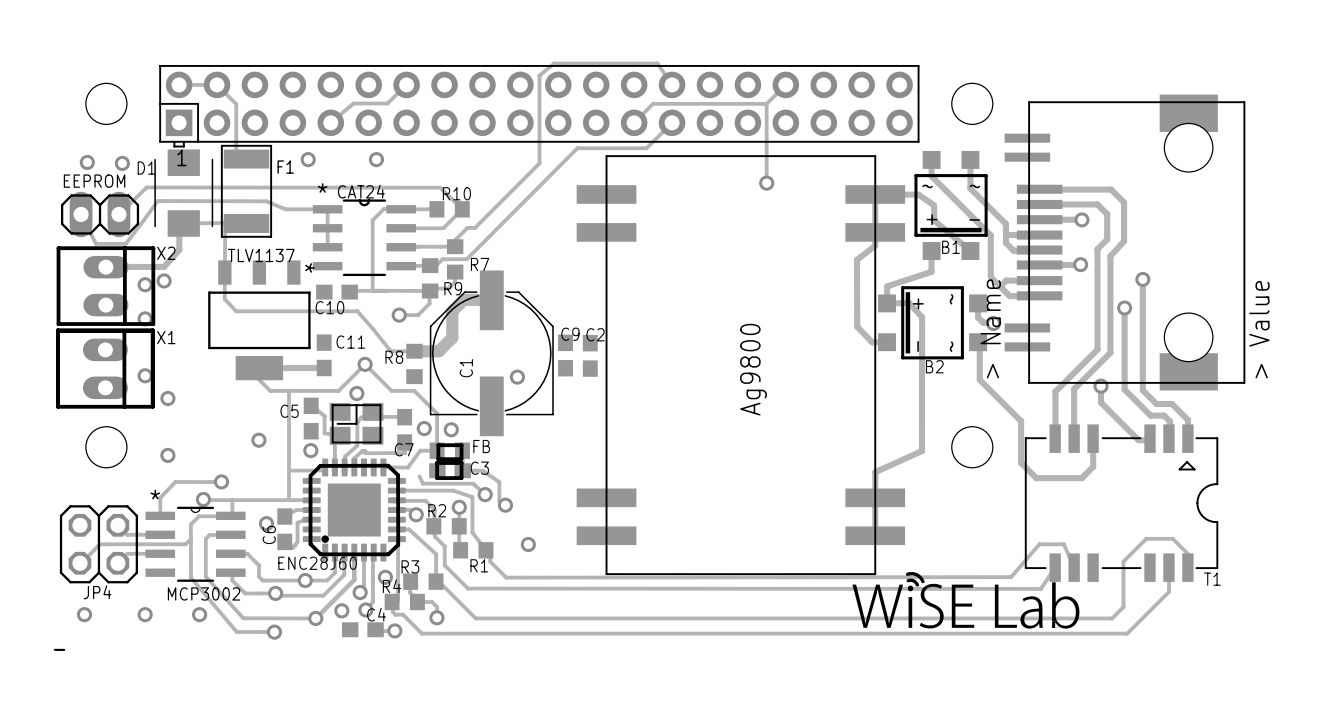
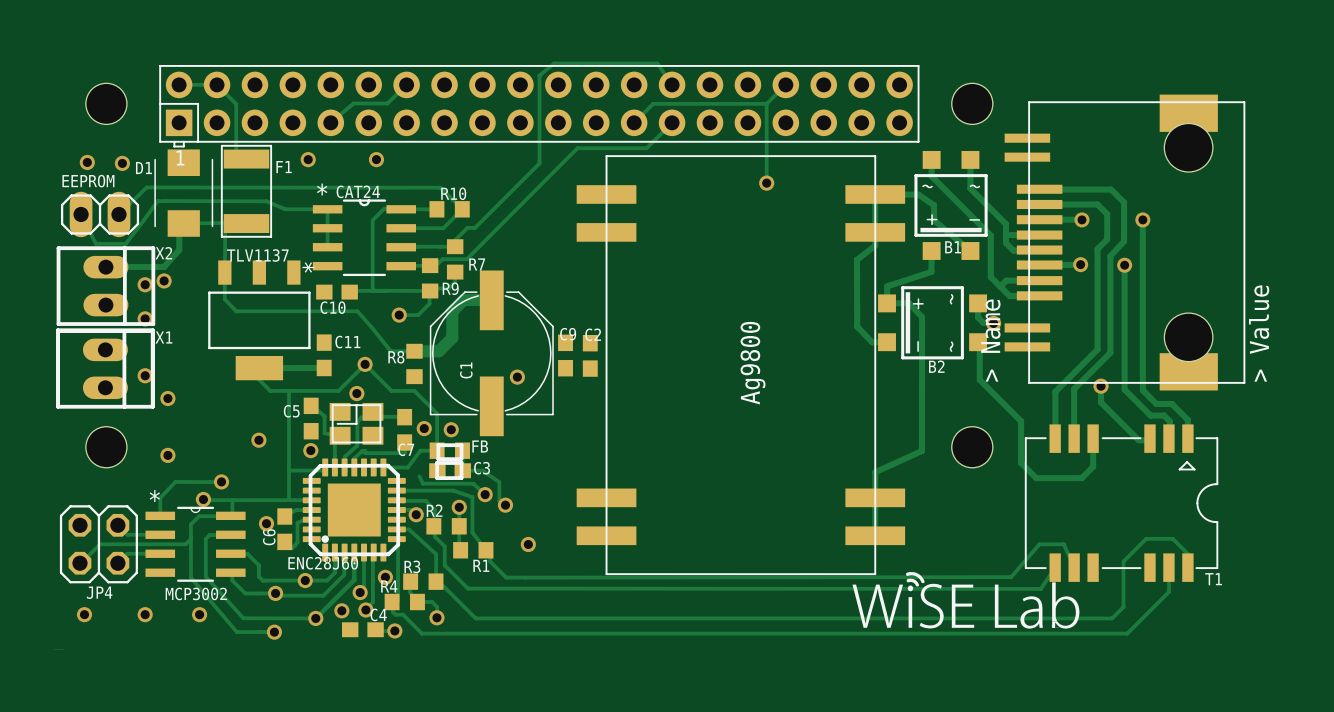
track: none -> (1142, 219) (1142, 279)
via: none -> (1142, 219)
track: none -> (1124, 265) (1124, 307)
via: none -> (1124, 265)
via: (1142, 279) -> none
via: (1124, 307) -> none

